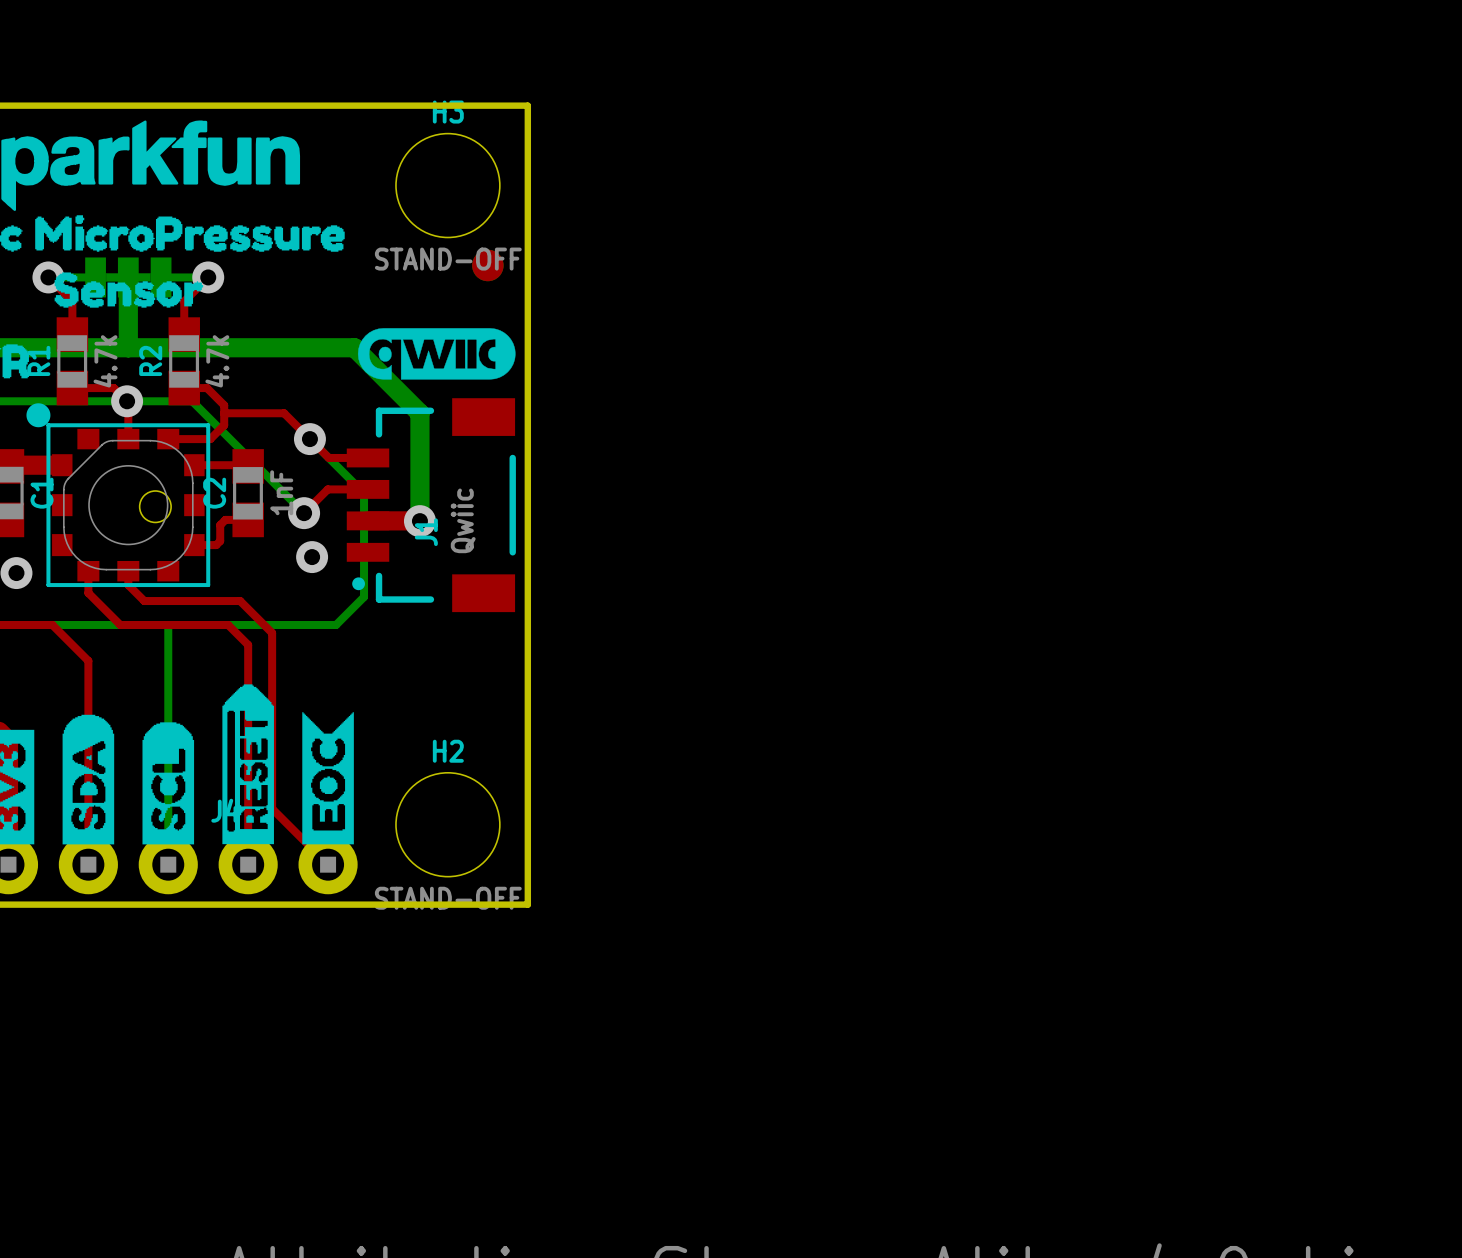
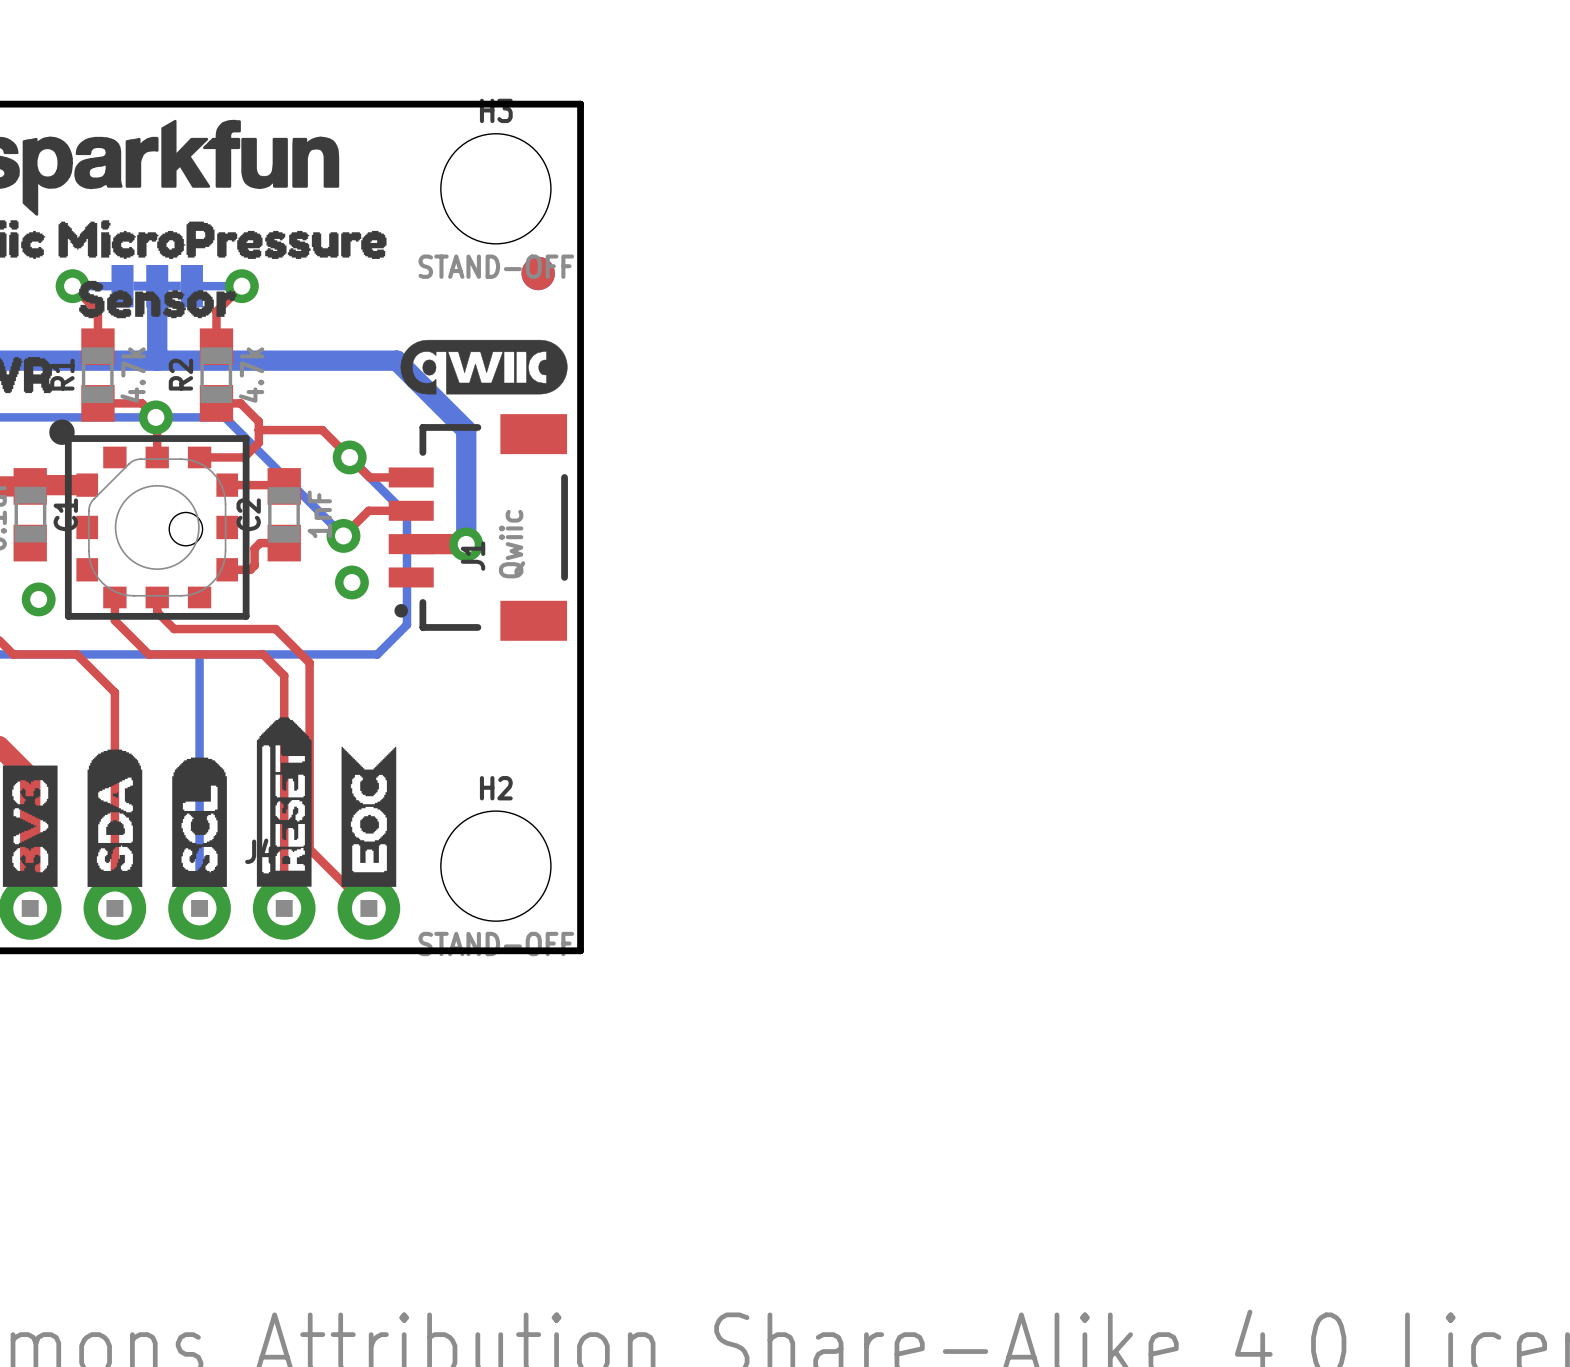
part footprint: [26, 403, 211, 588] -> [49, 419, 250, 620]

